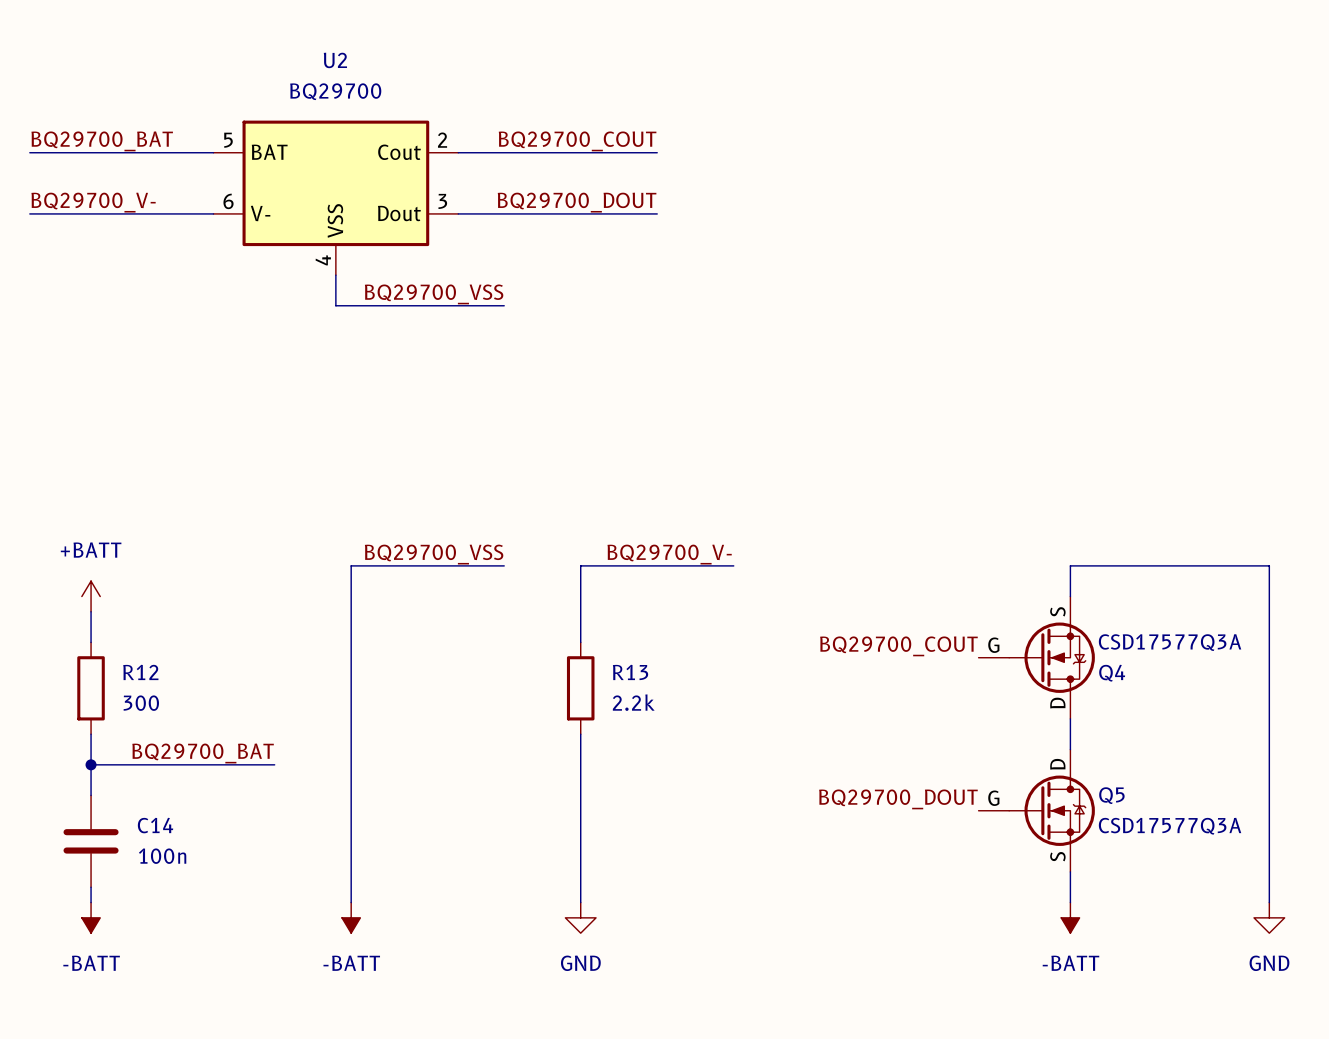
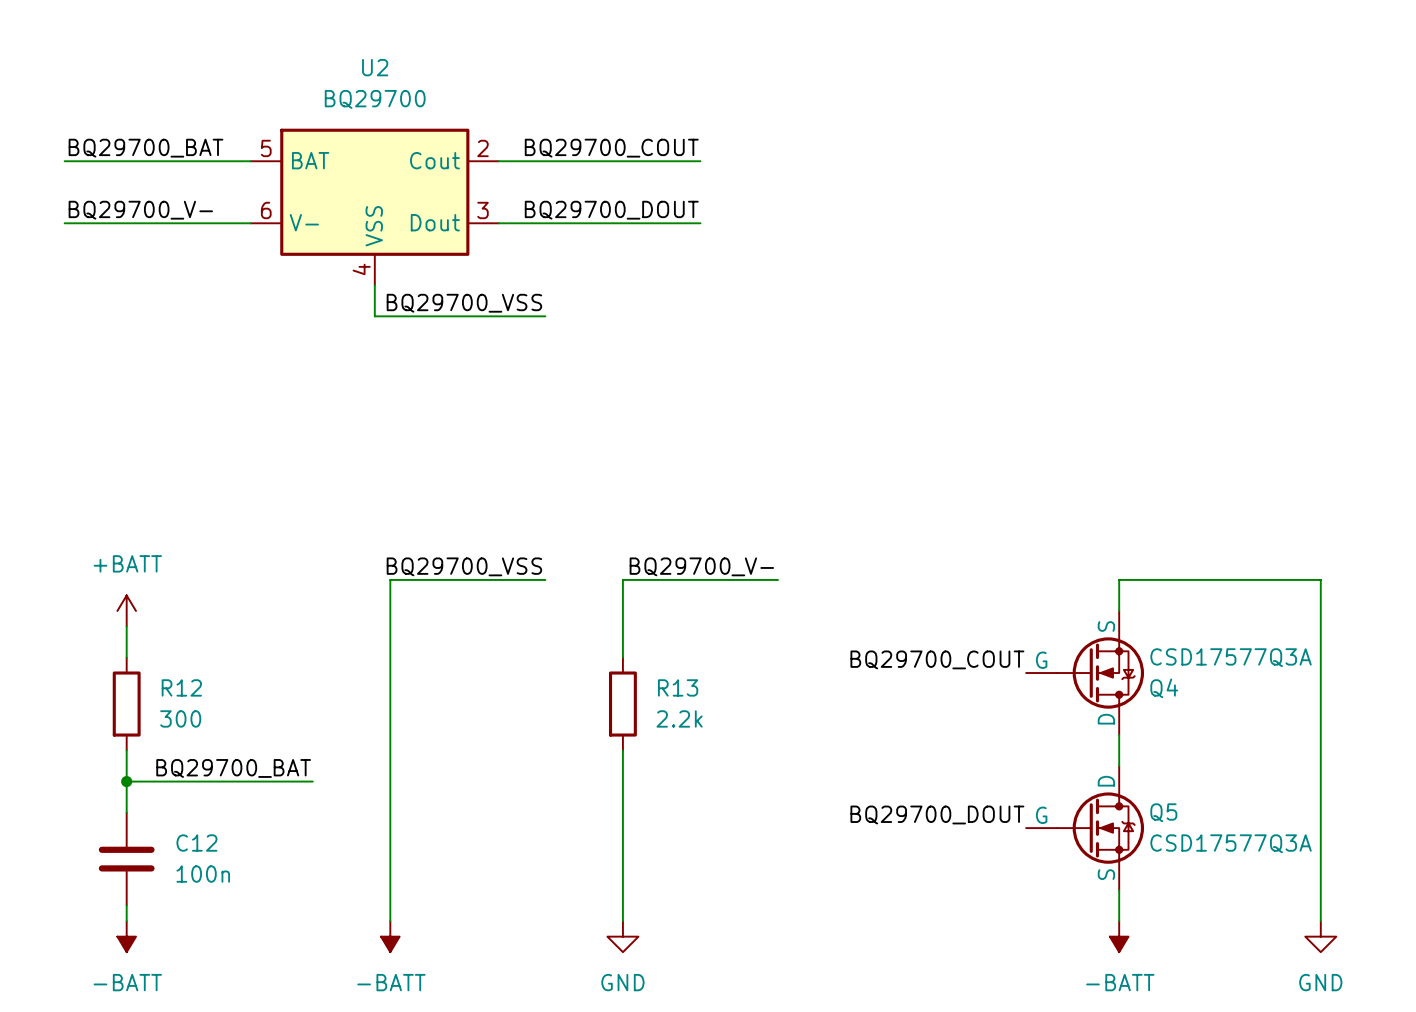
C14 name: C14 (155, 825) -> C12 (196, 843)

